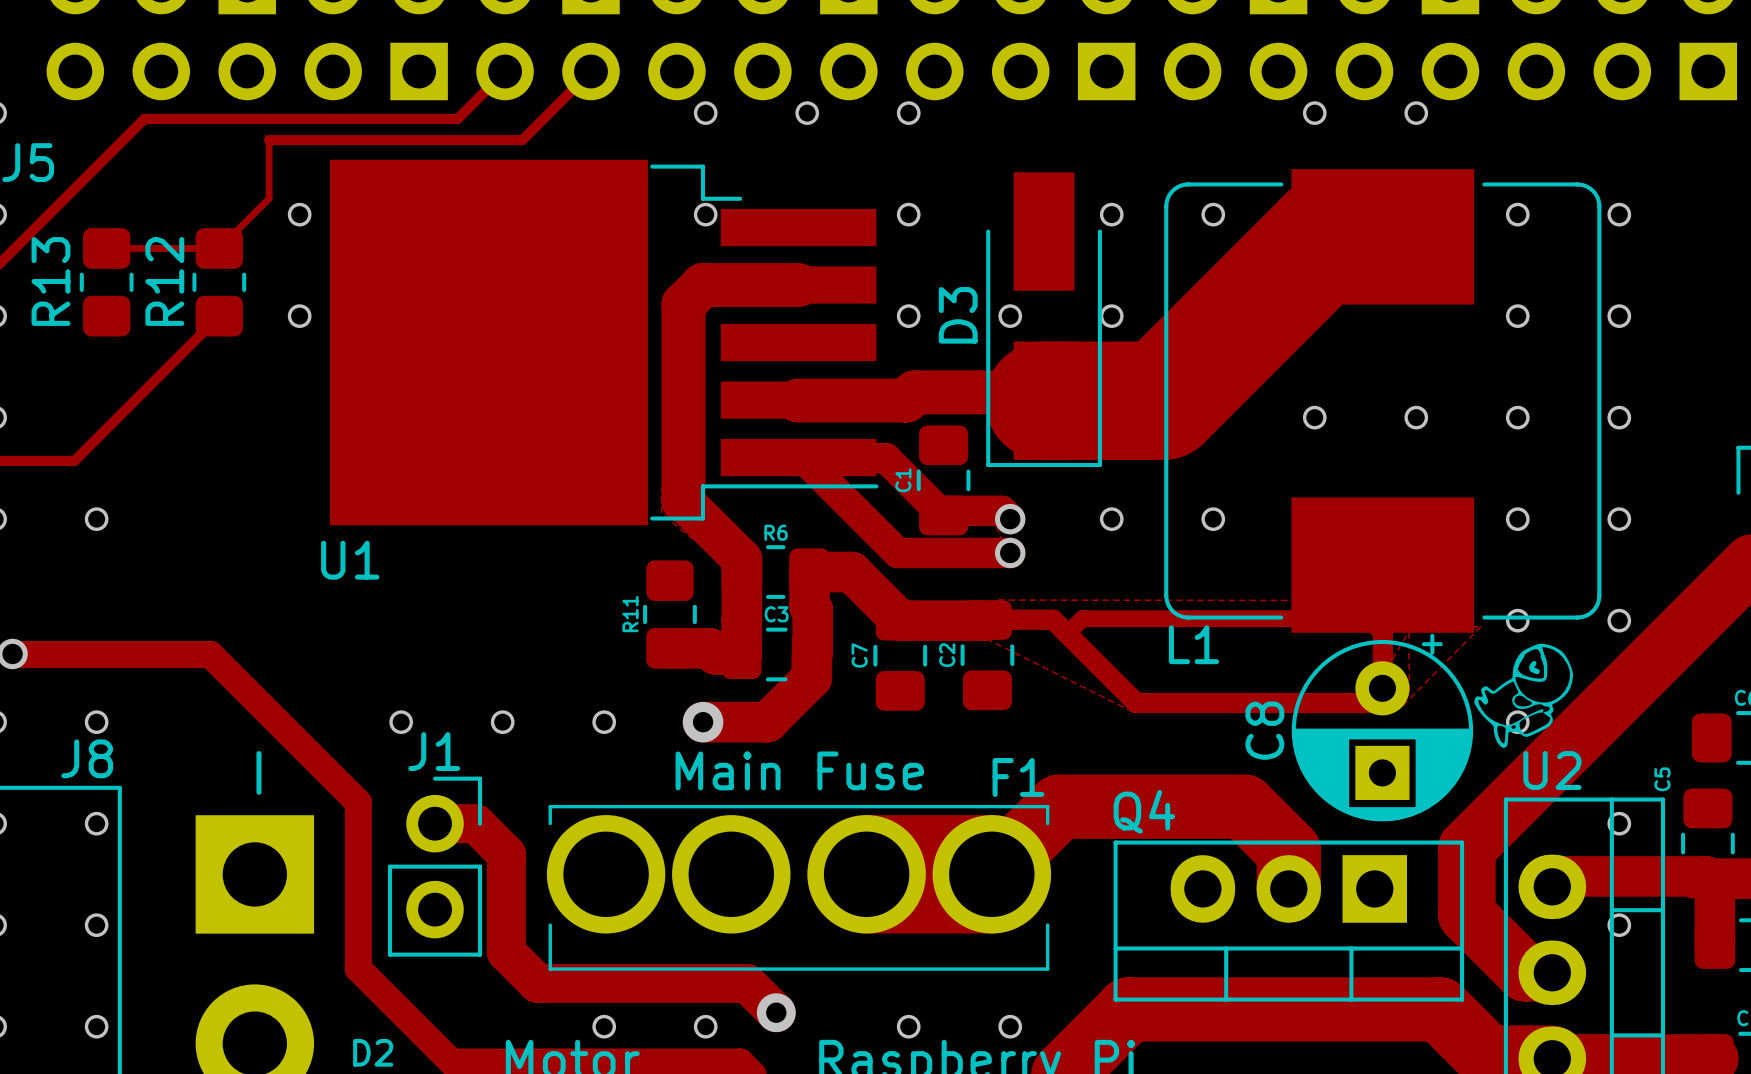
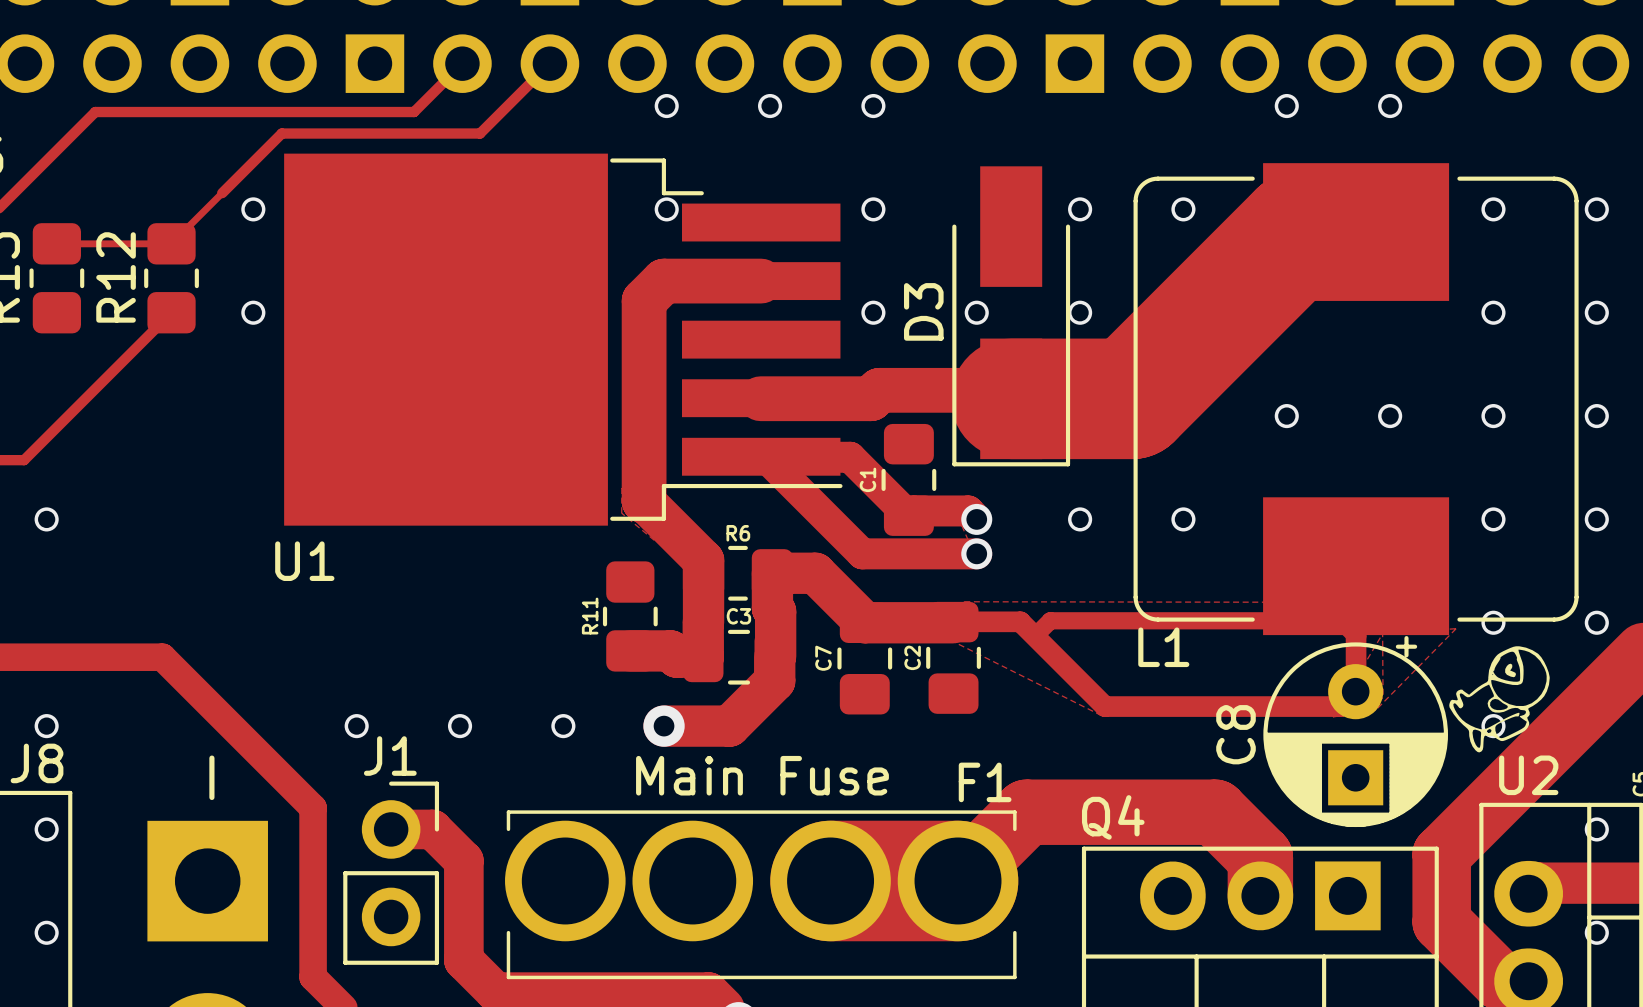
track: (327, 140) (269, 140) (269, 198) -> (281, 133) (222, 193)

